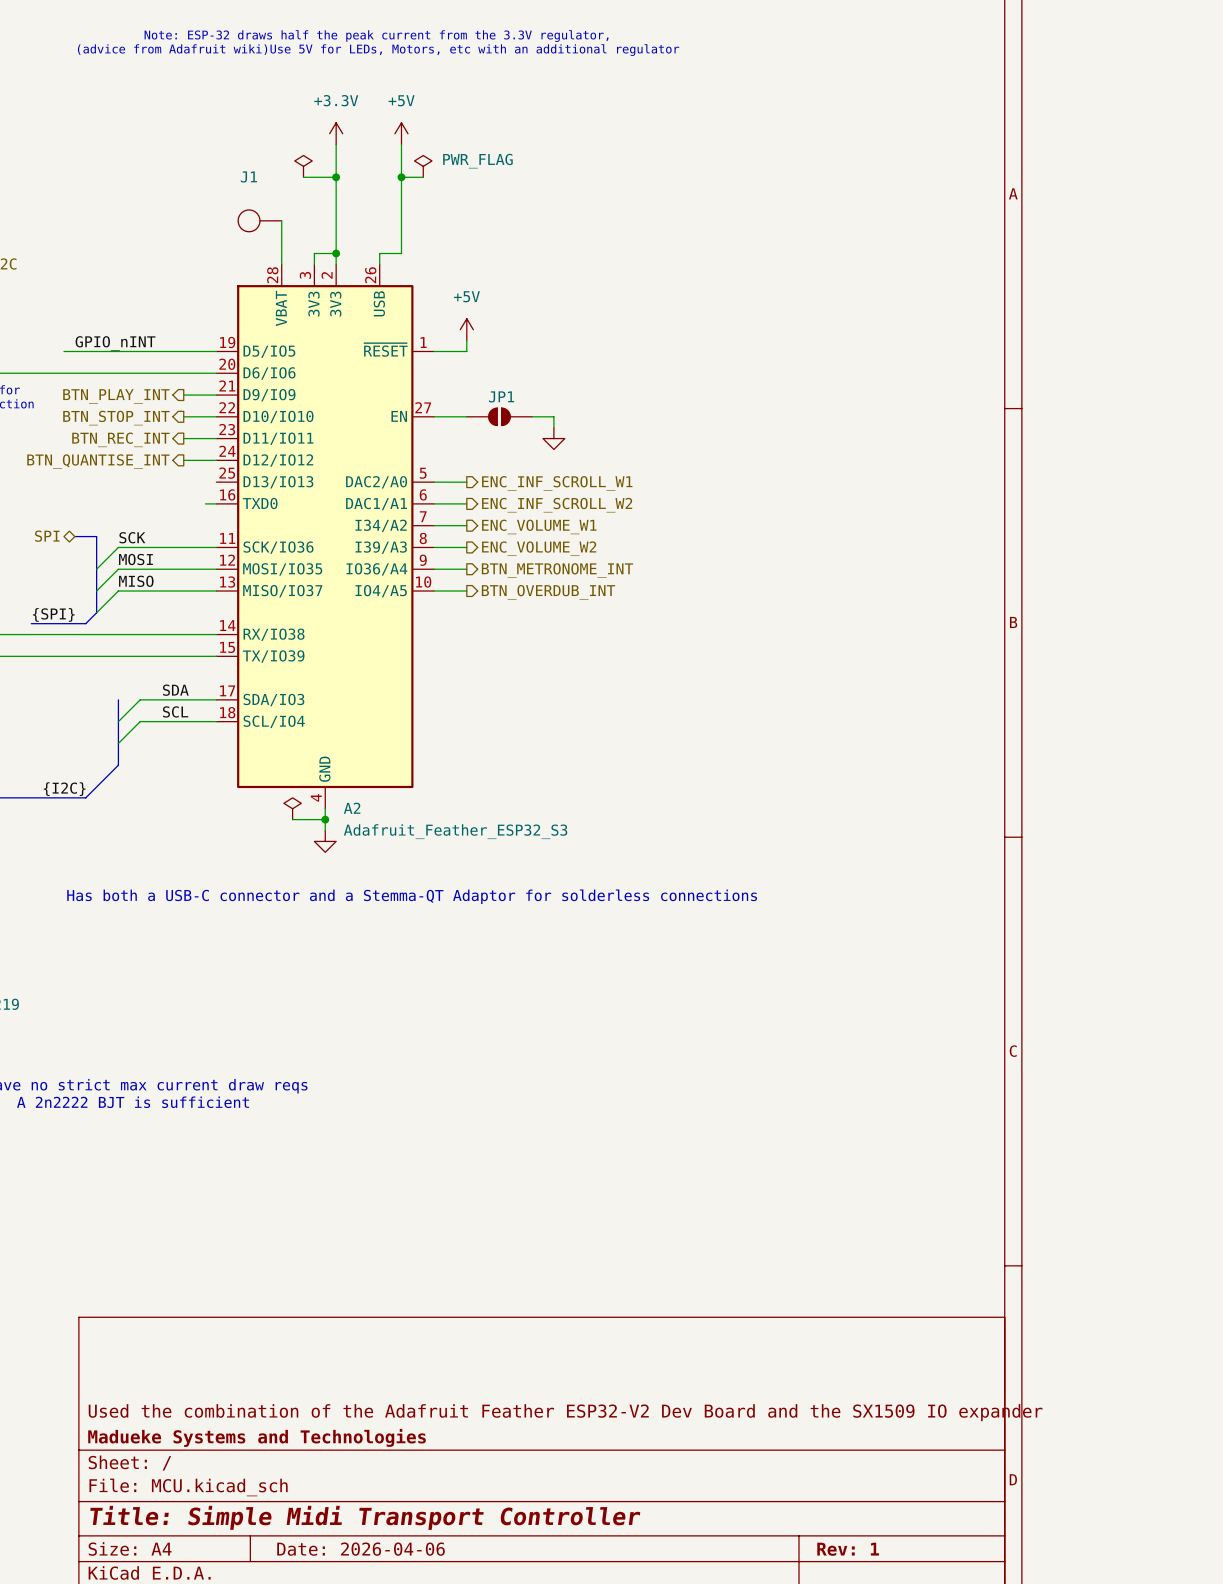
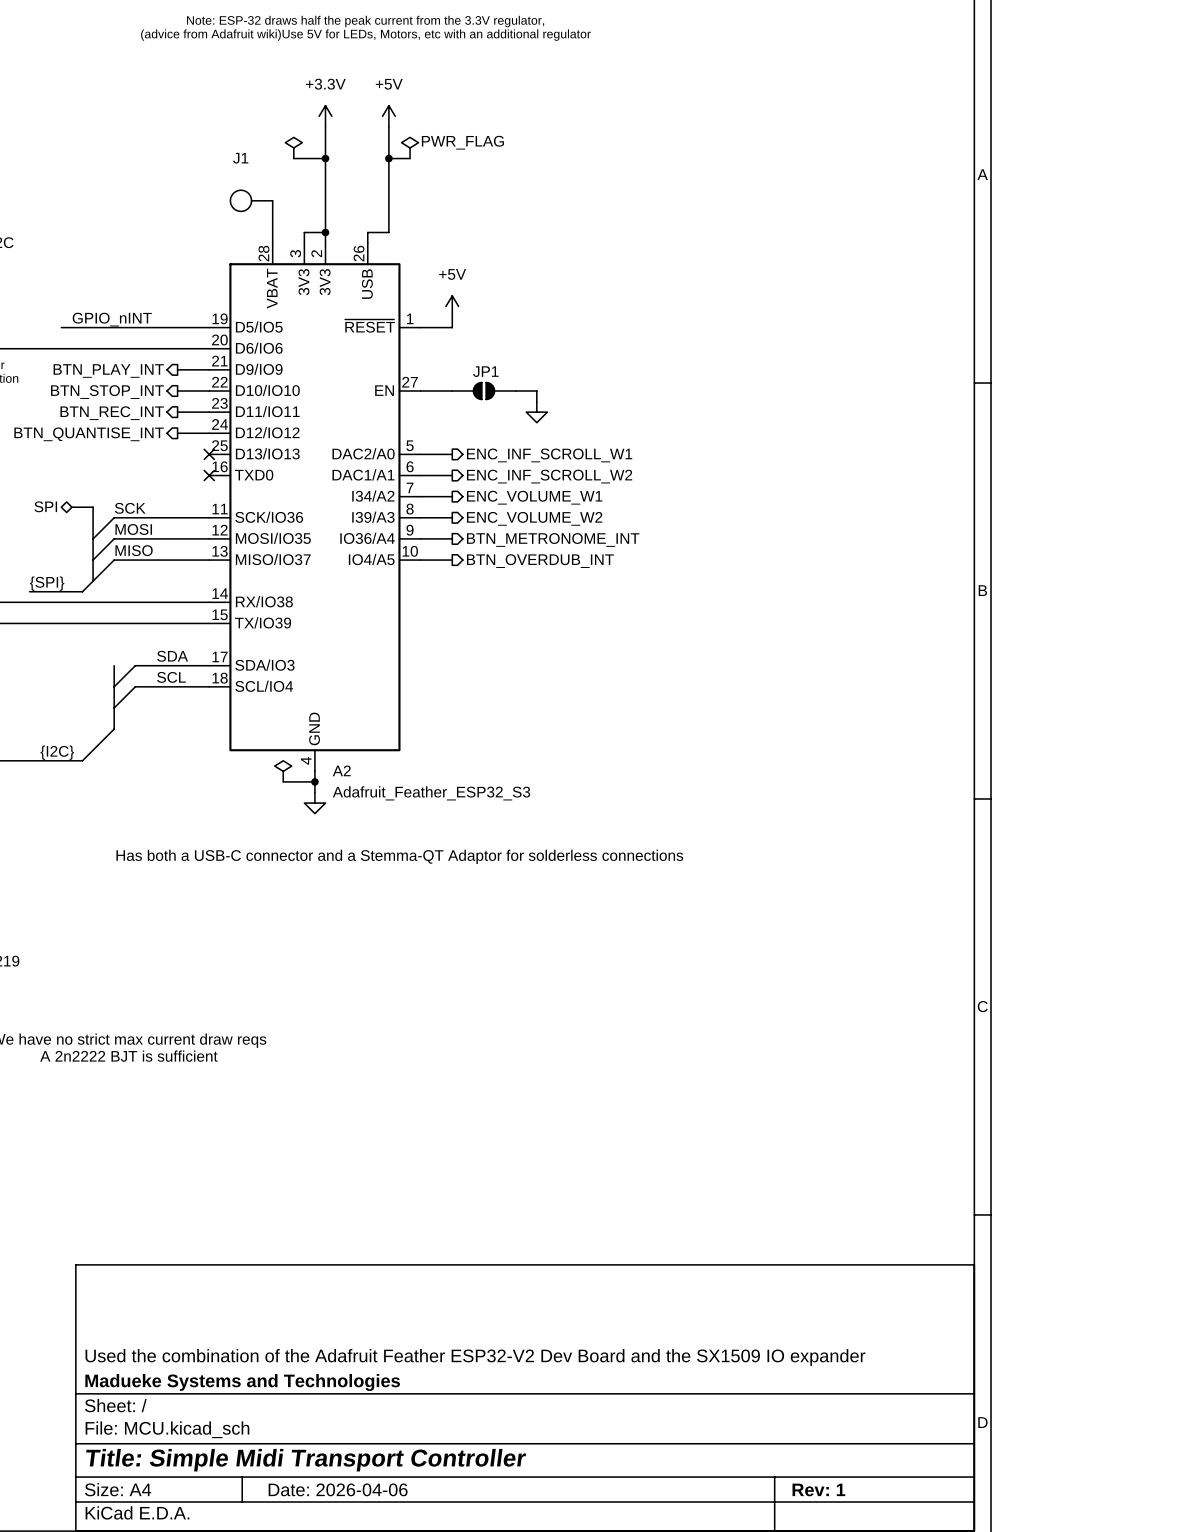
no-connect mark: none -> (209, 454)
wire: (205, 503) (216, 503) -> none
no-connect mark: none -> (209, 475)

